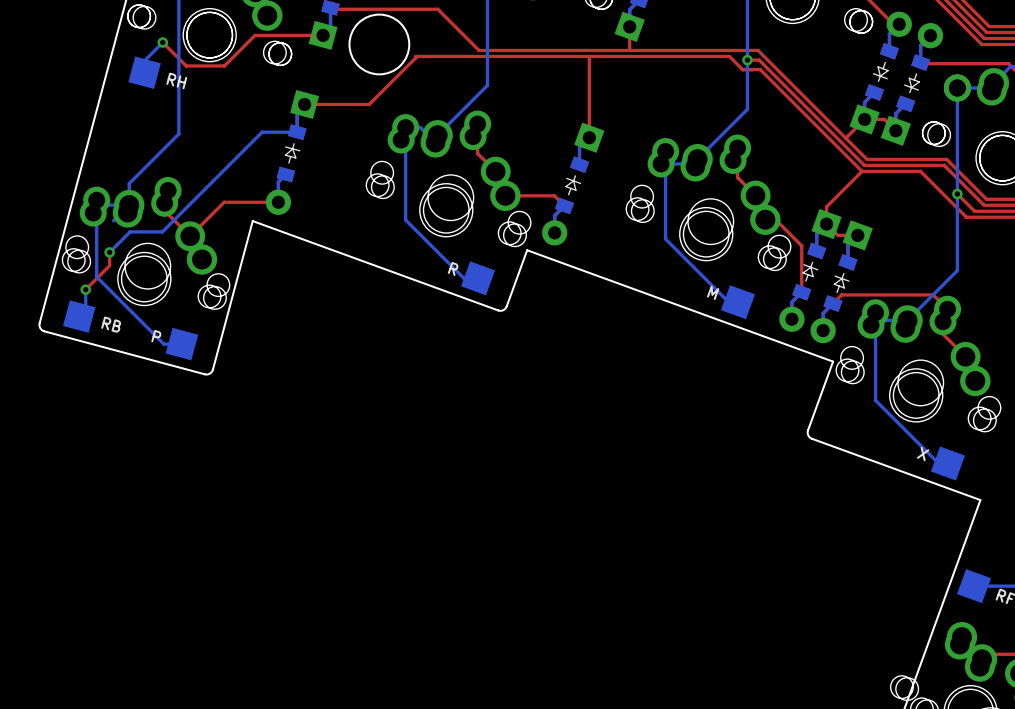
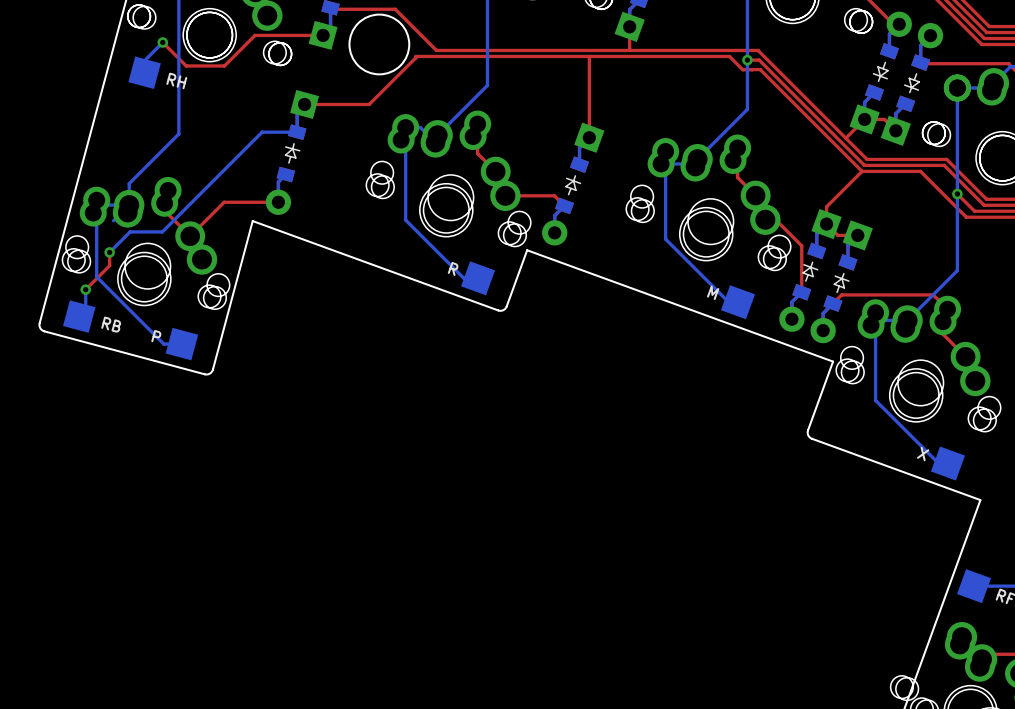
top track: (395, 9) (437, 9) (479, 50) -> (395, 9) (436, 50) (479, 50)

